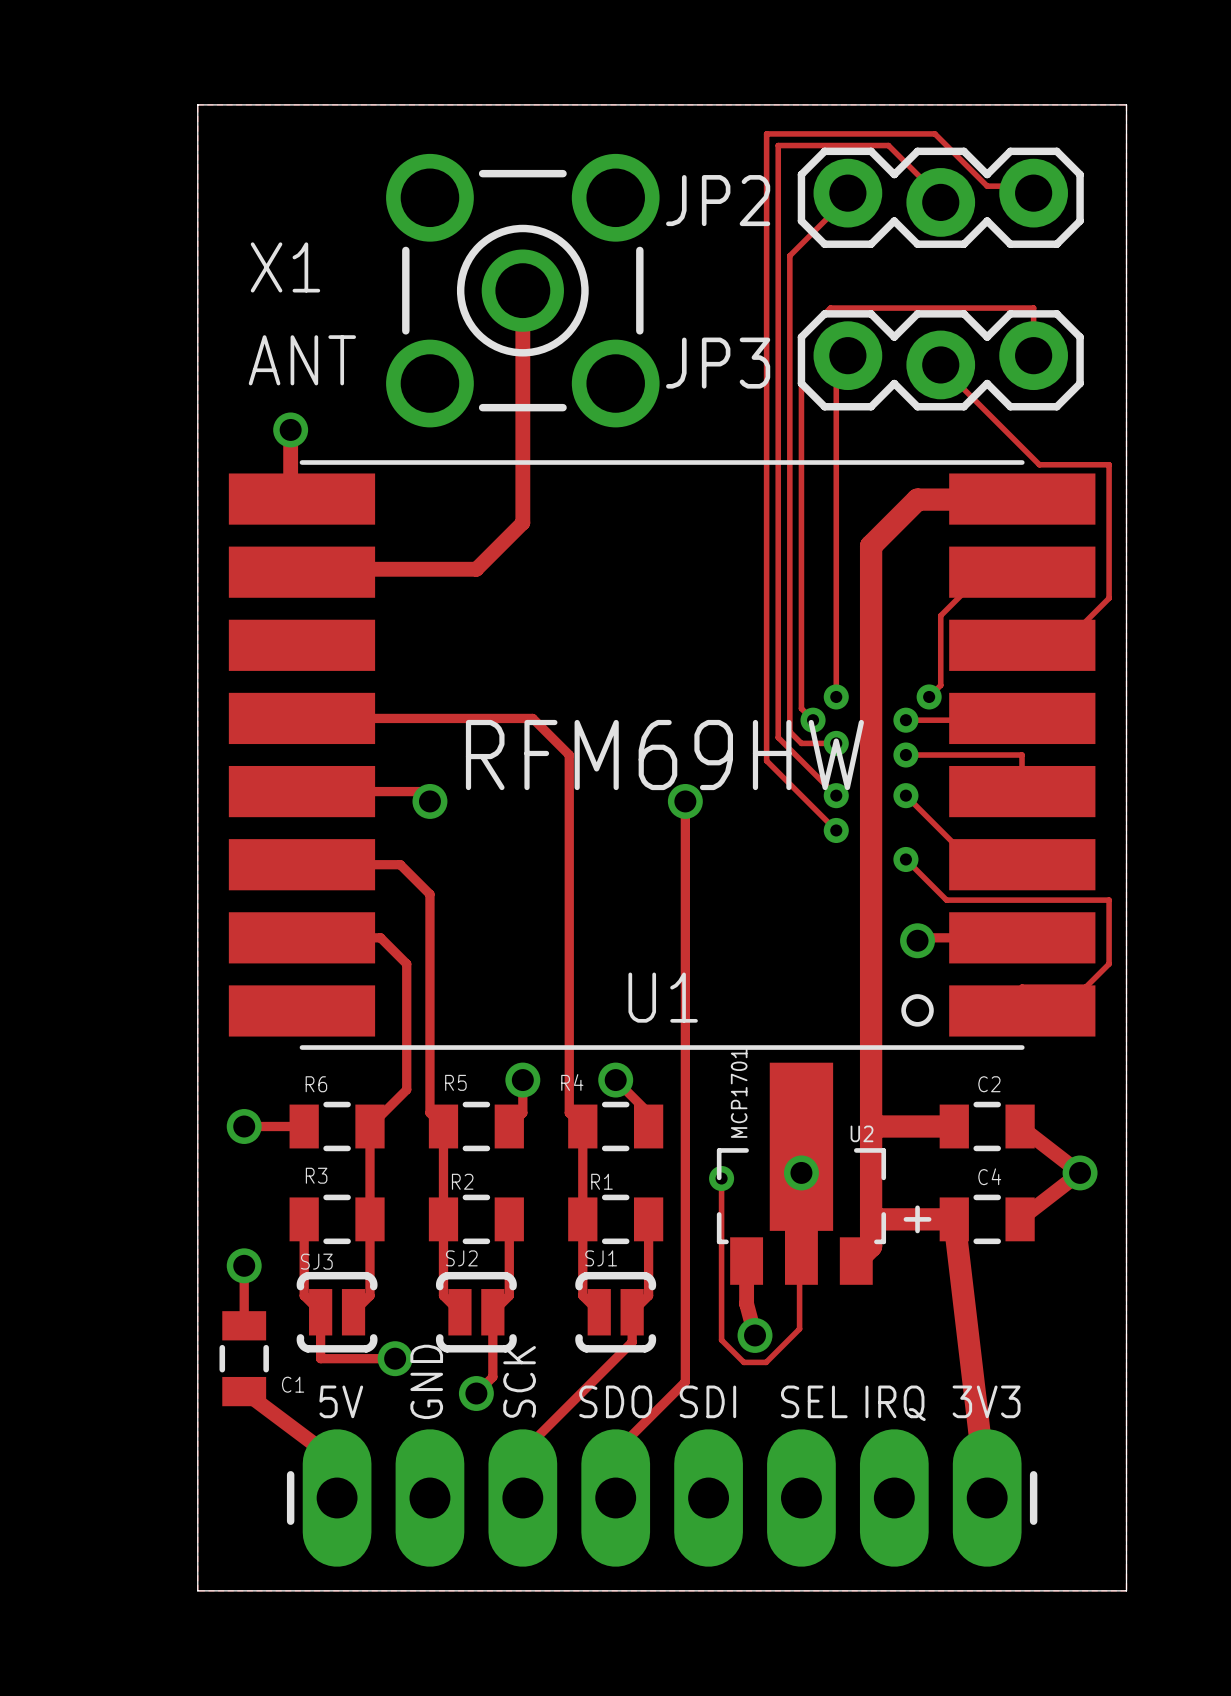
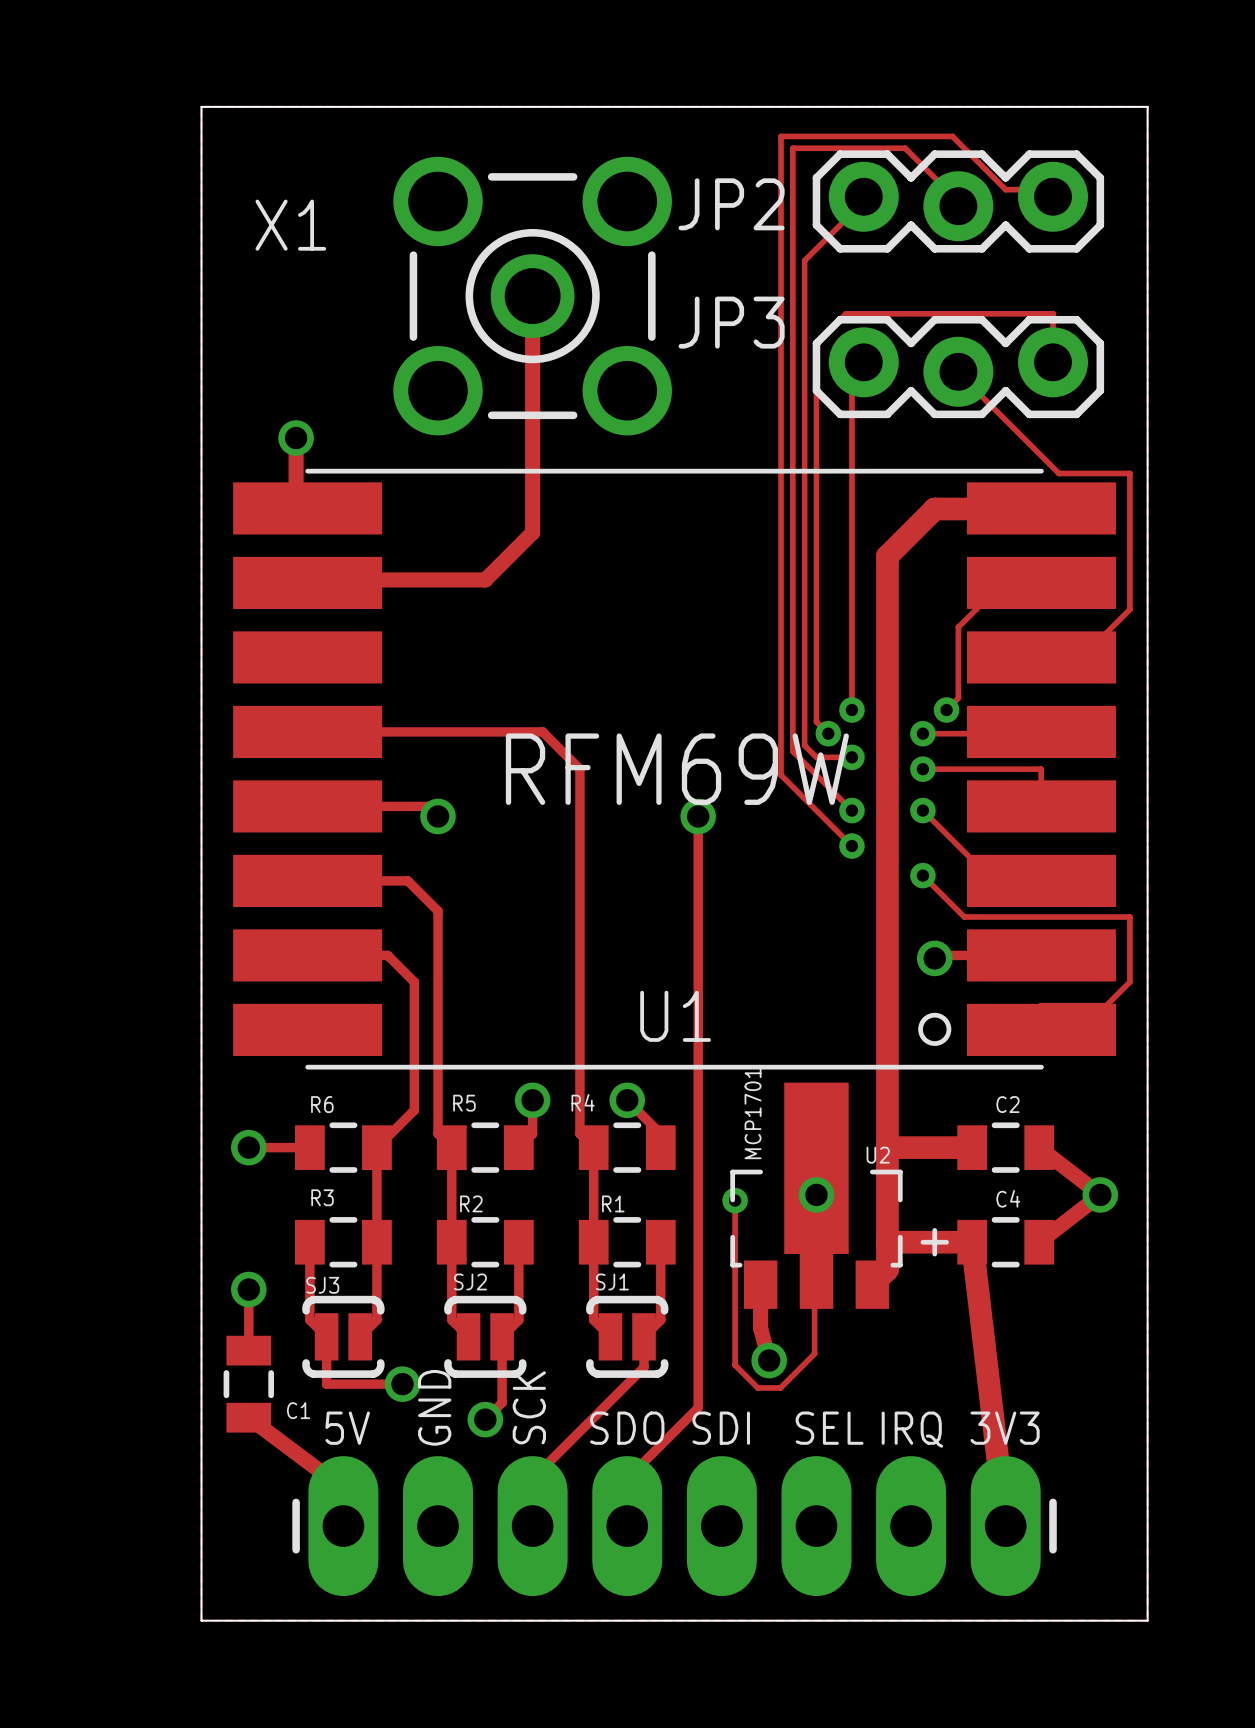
X1 name position: X1 (285, 267) -> X1 (290, 225)
X1 value: ANT (302, 360) -> none
JP3 name position: JP3 (718, 363) -> JP3 (731, 322)
U1 text: none -> RFM69W (677, 769)
U1 value: RFM69HW (664, 755) -> none

